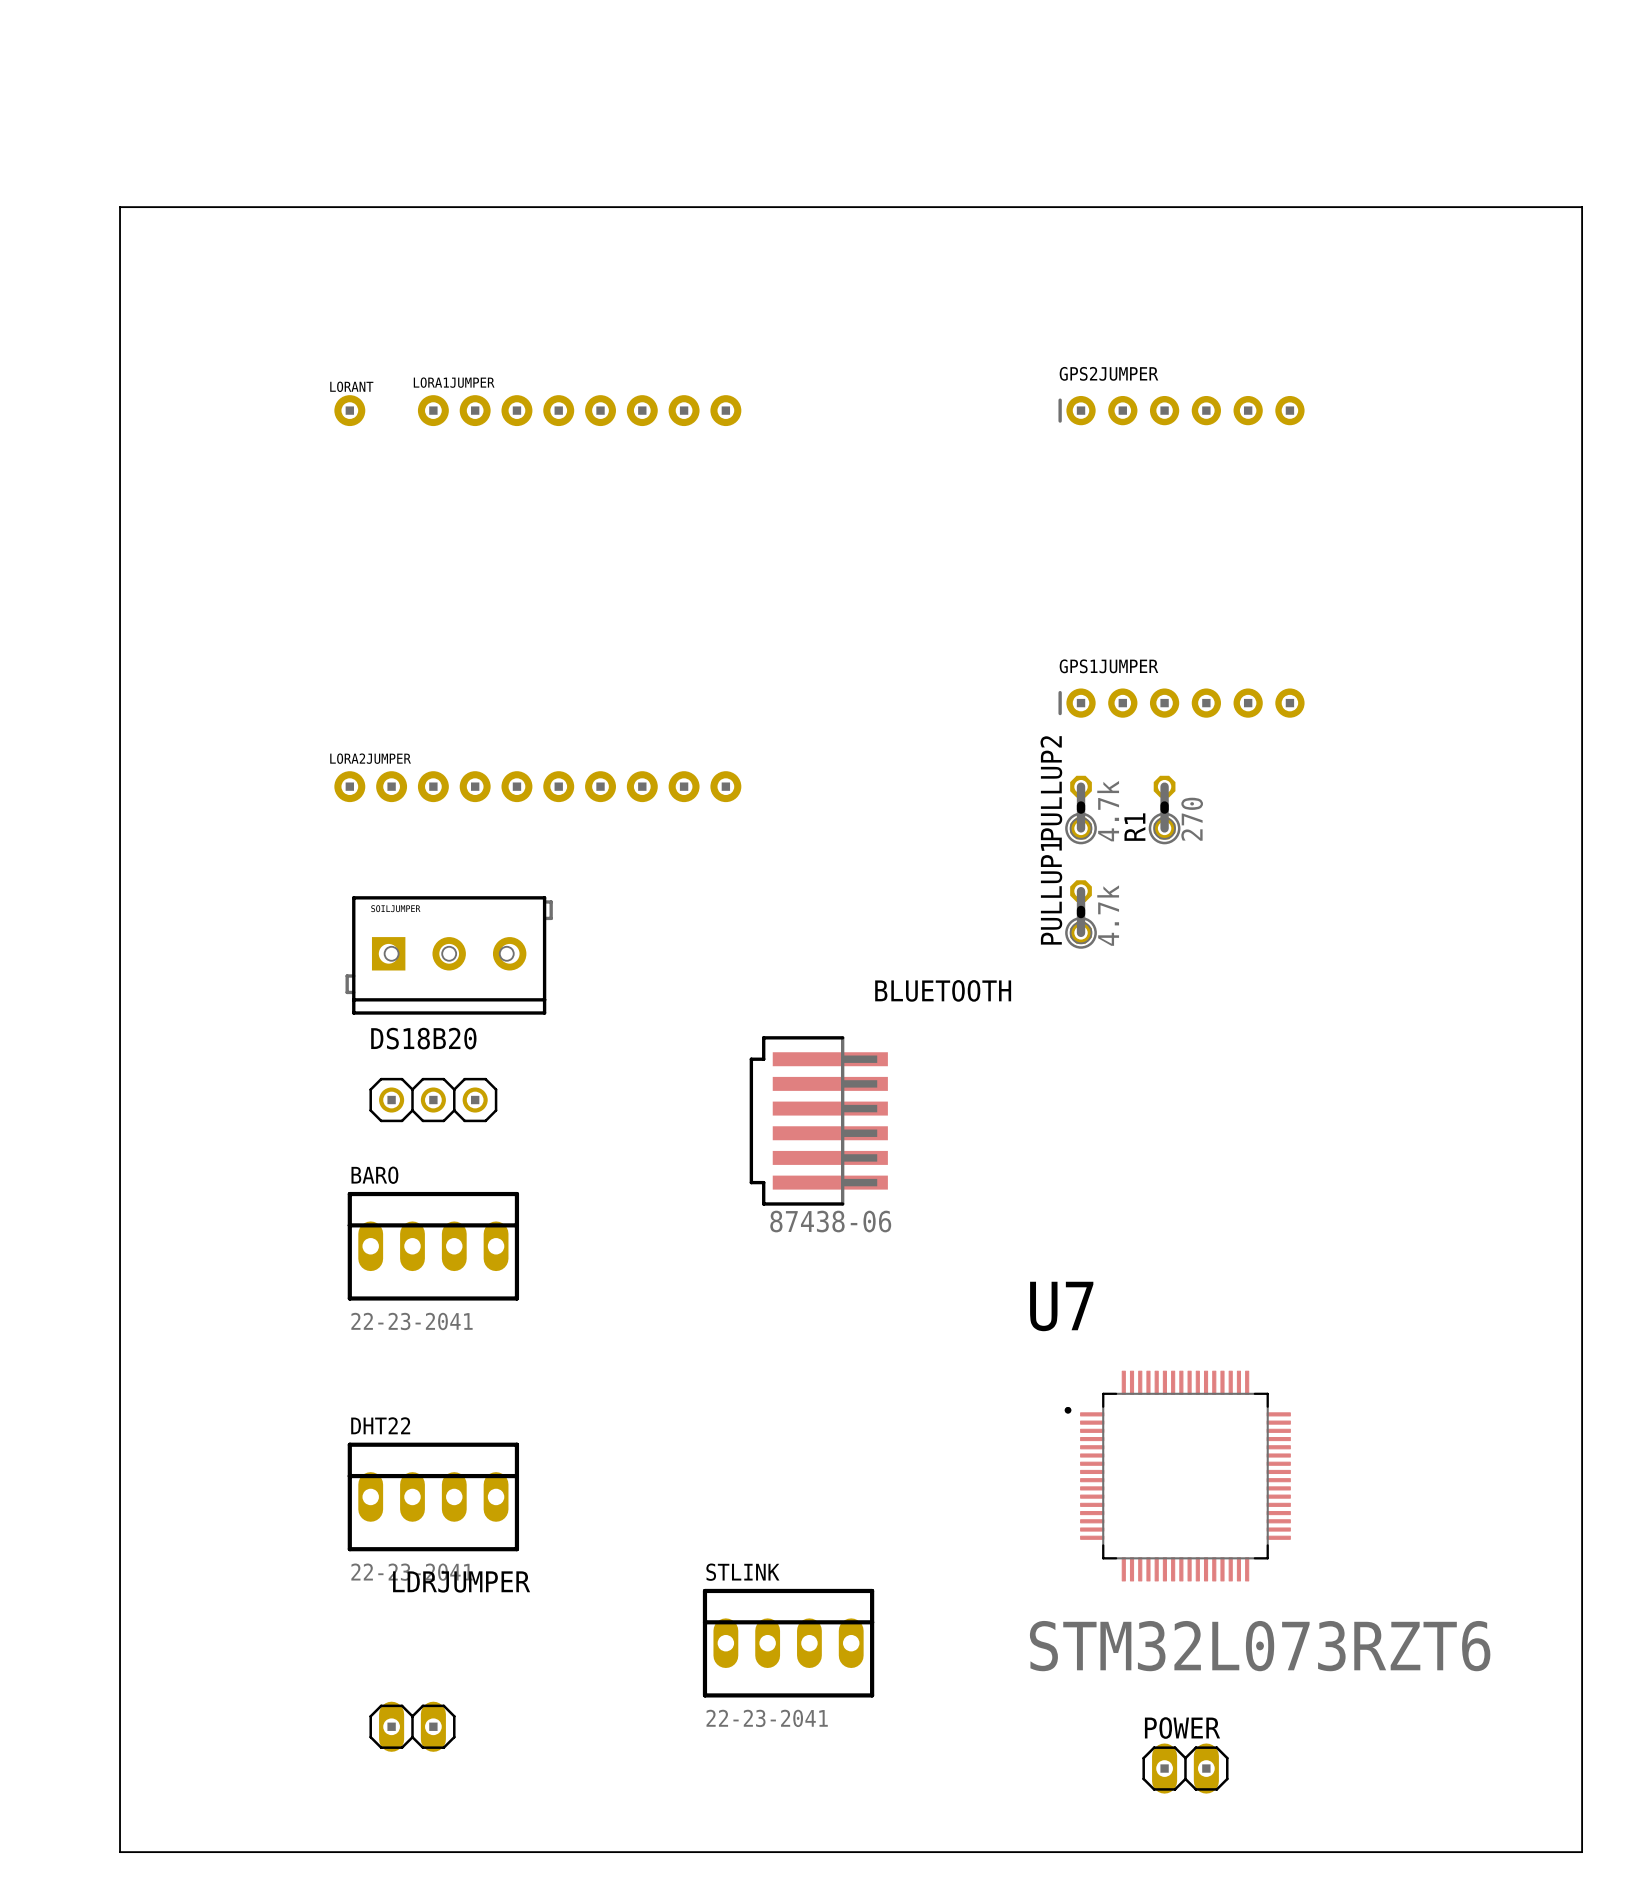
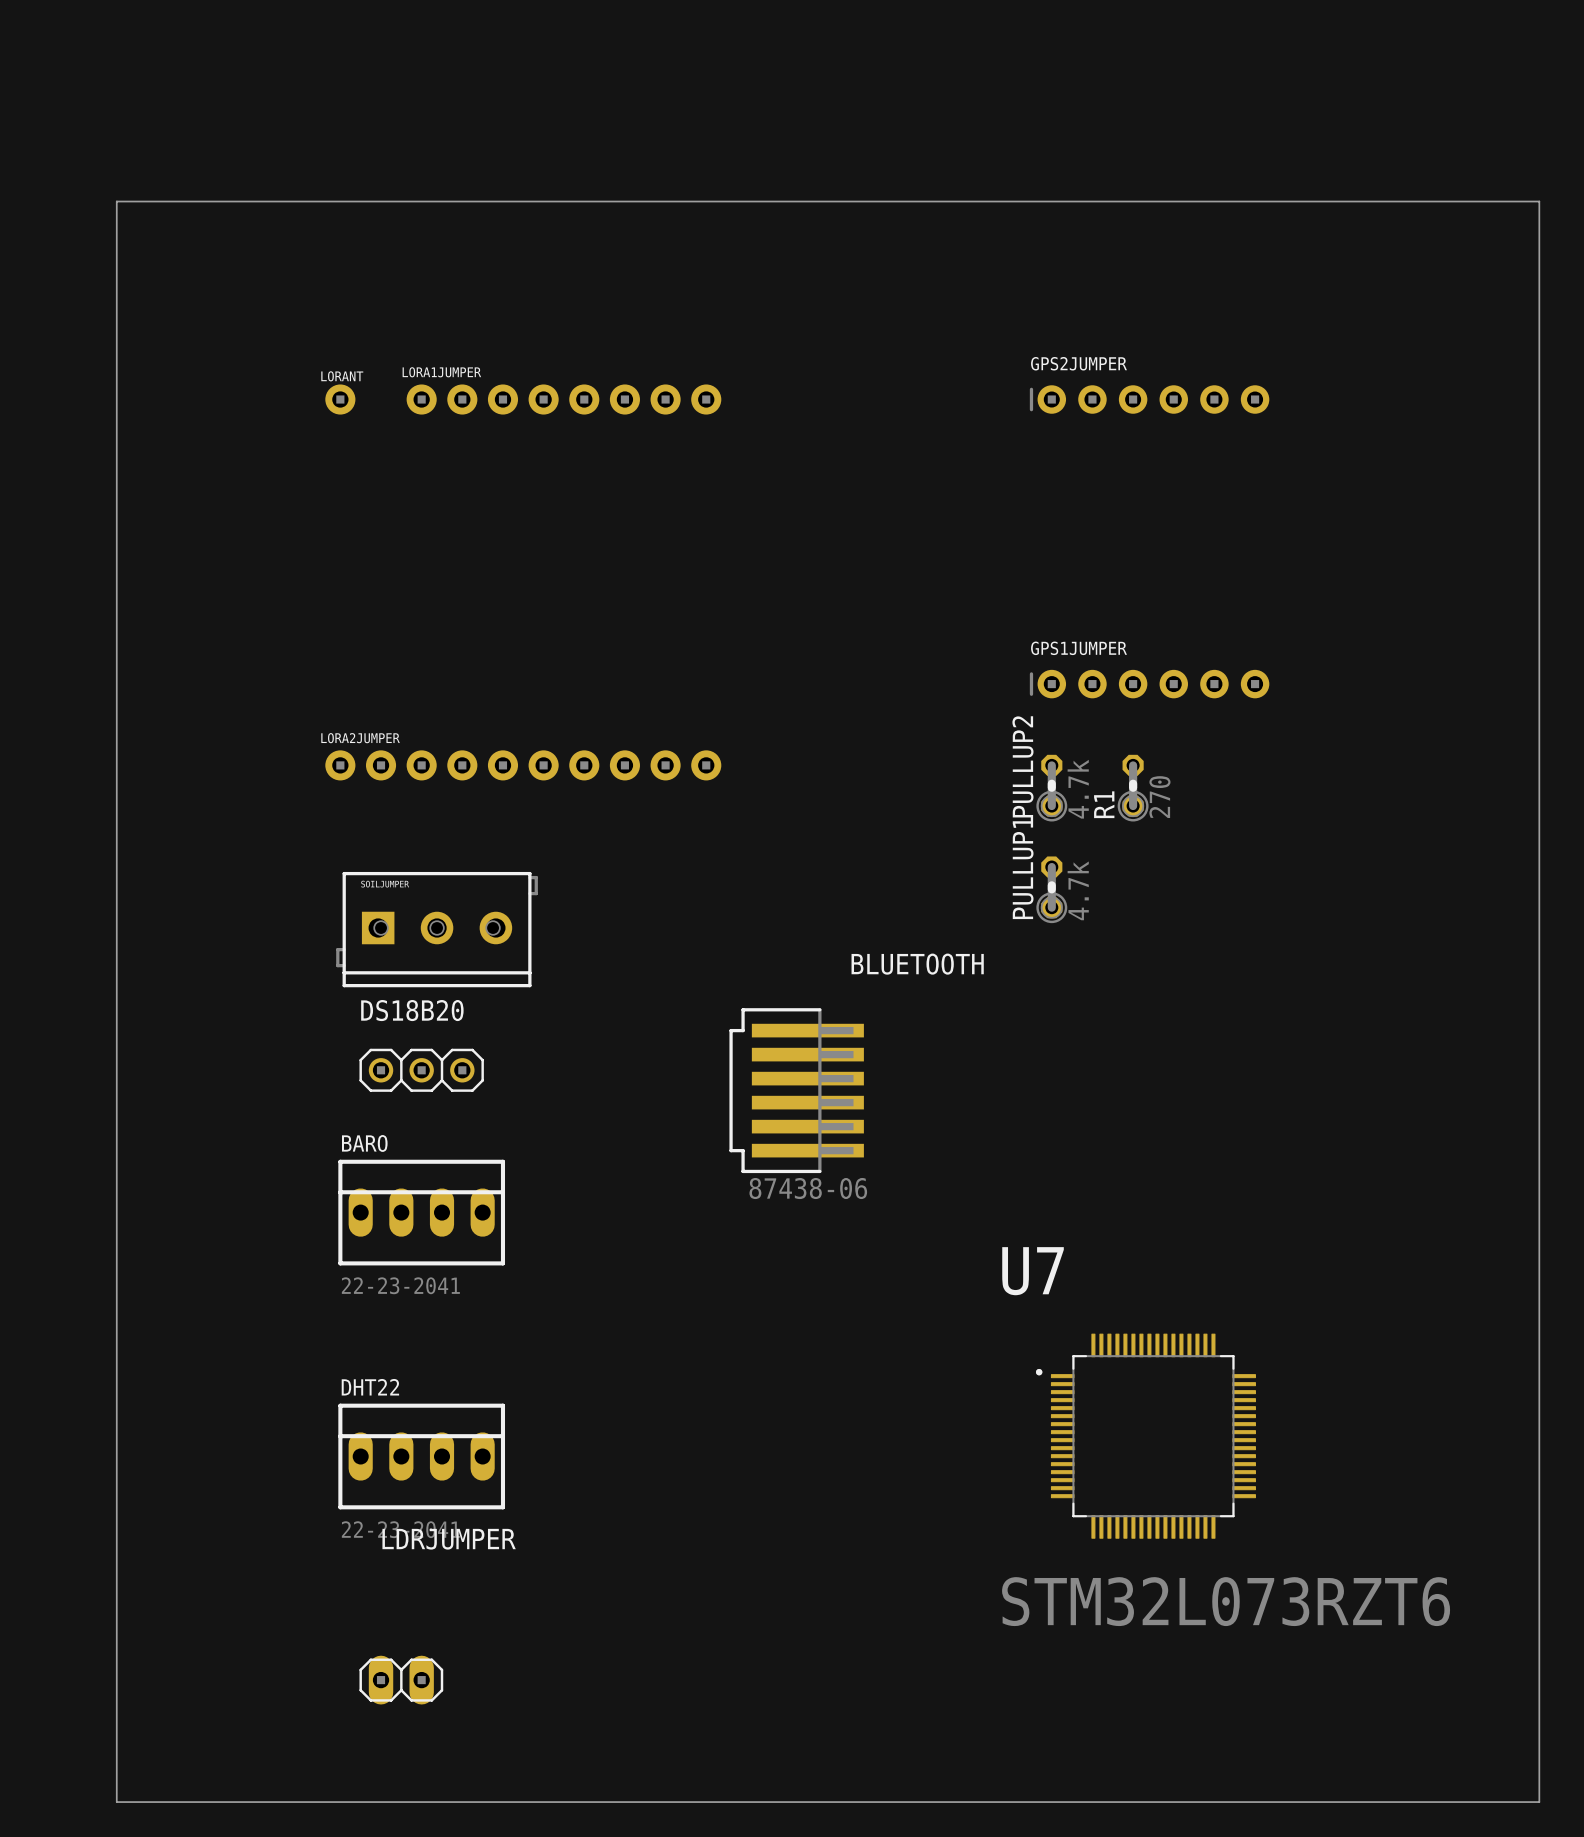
STLINK: 22-23-2041 (788, 1643) -> none
POWER: (1185, 1768) -> none

